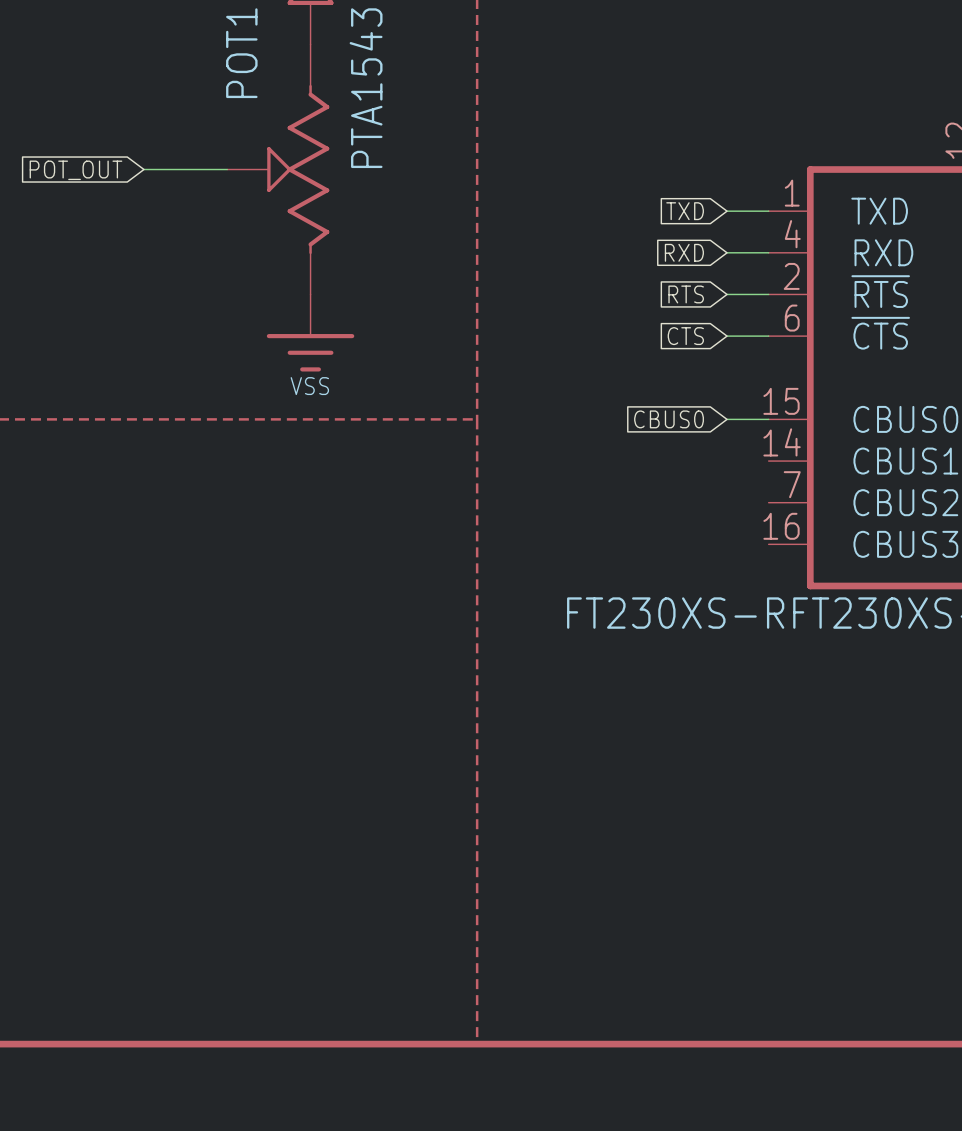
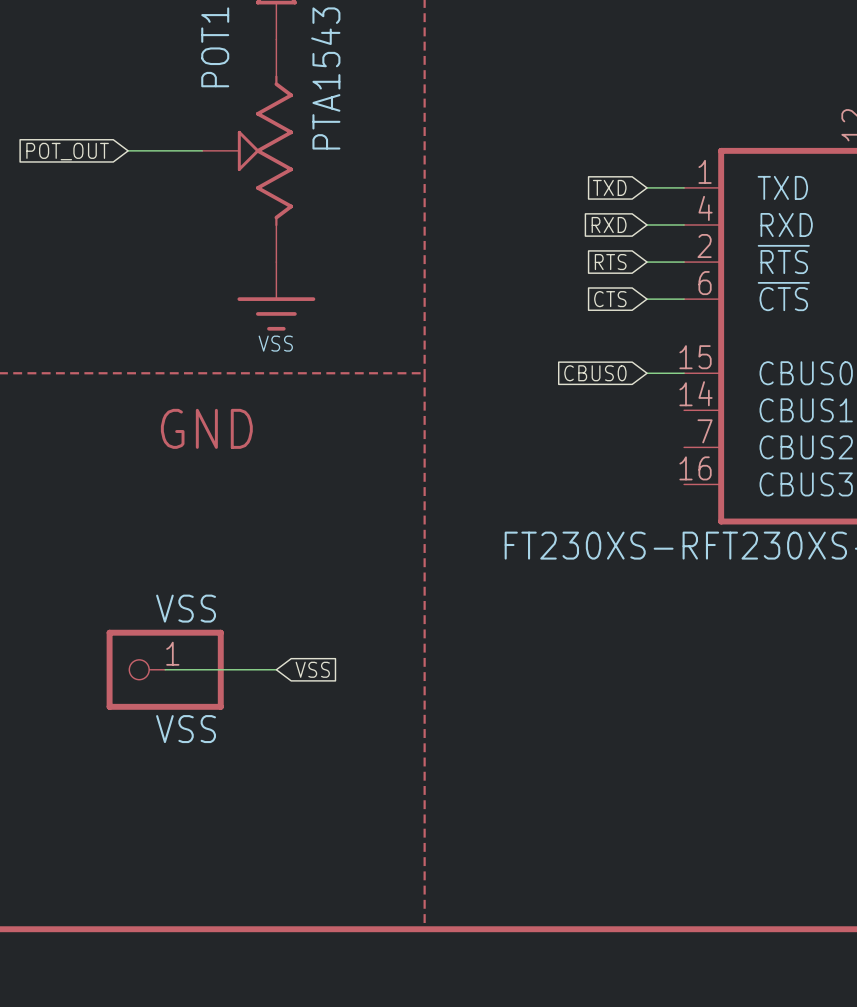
text: none -> GND (206, 428)
wire: none -> (165, 669) (276, 669)
VSS: none -> VSS (165, 669)
global label: none -> VSS (312, 669)

